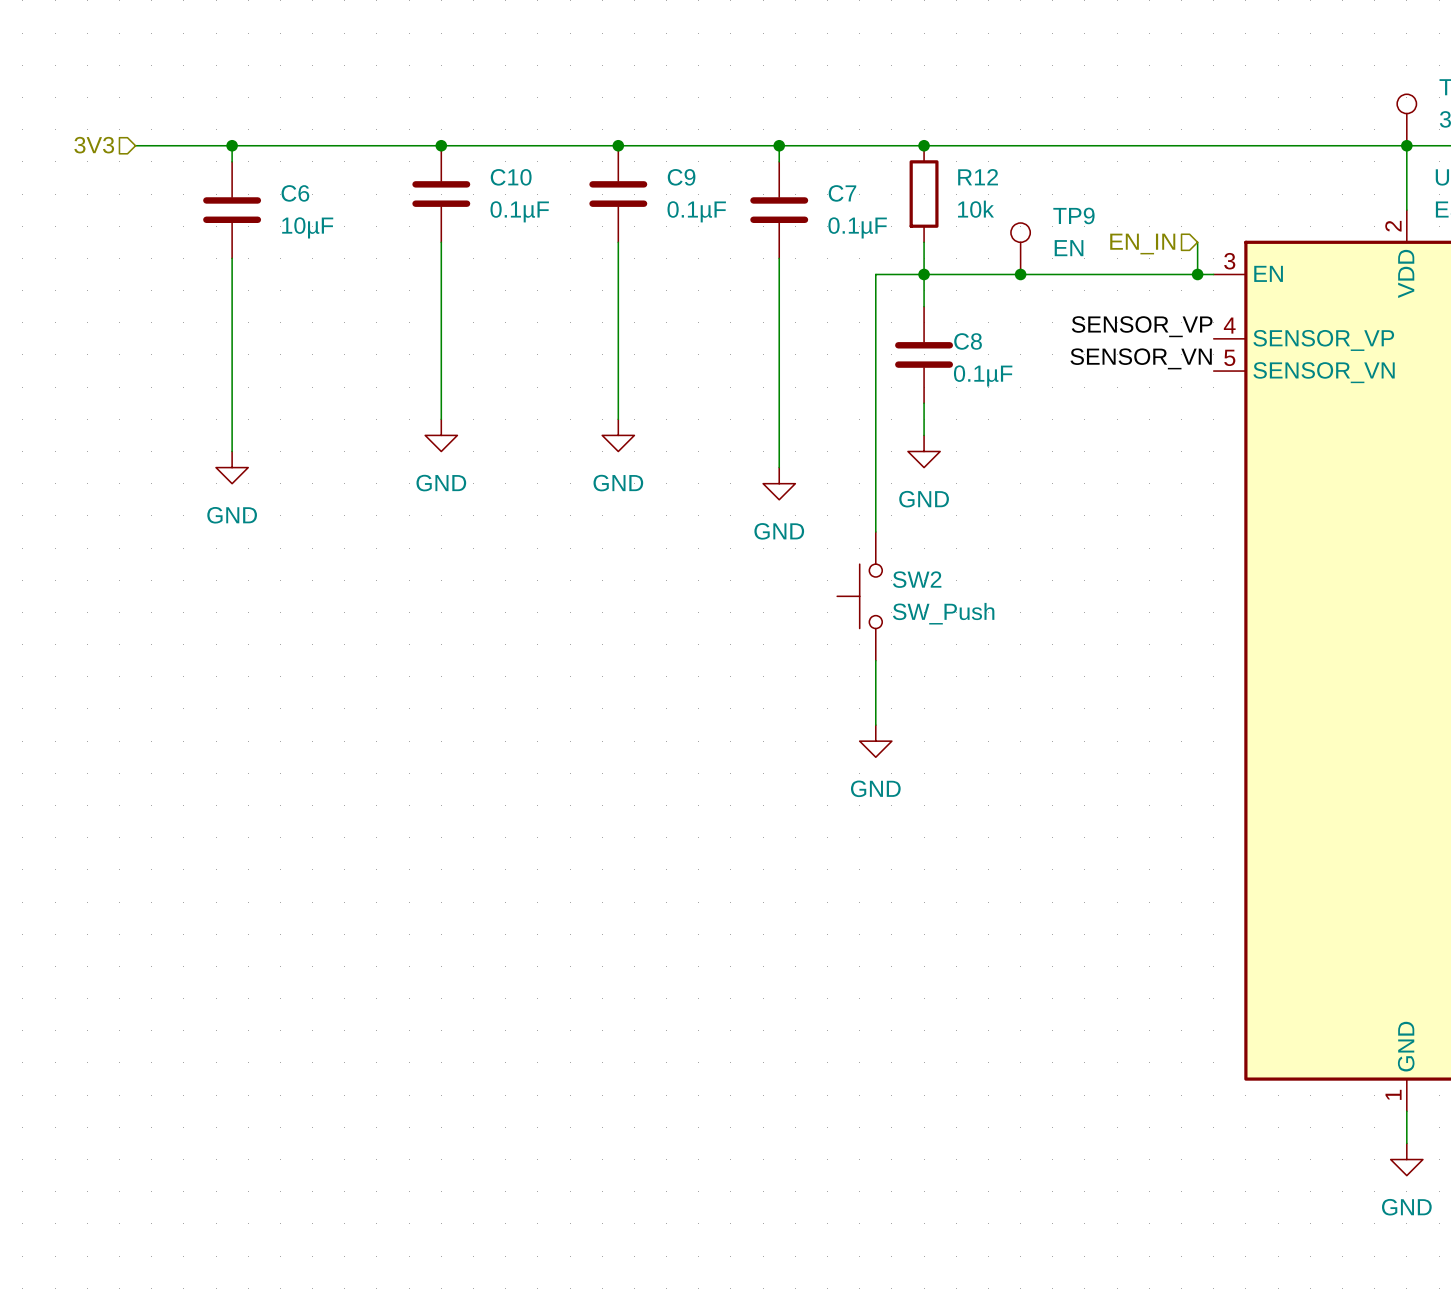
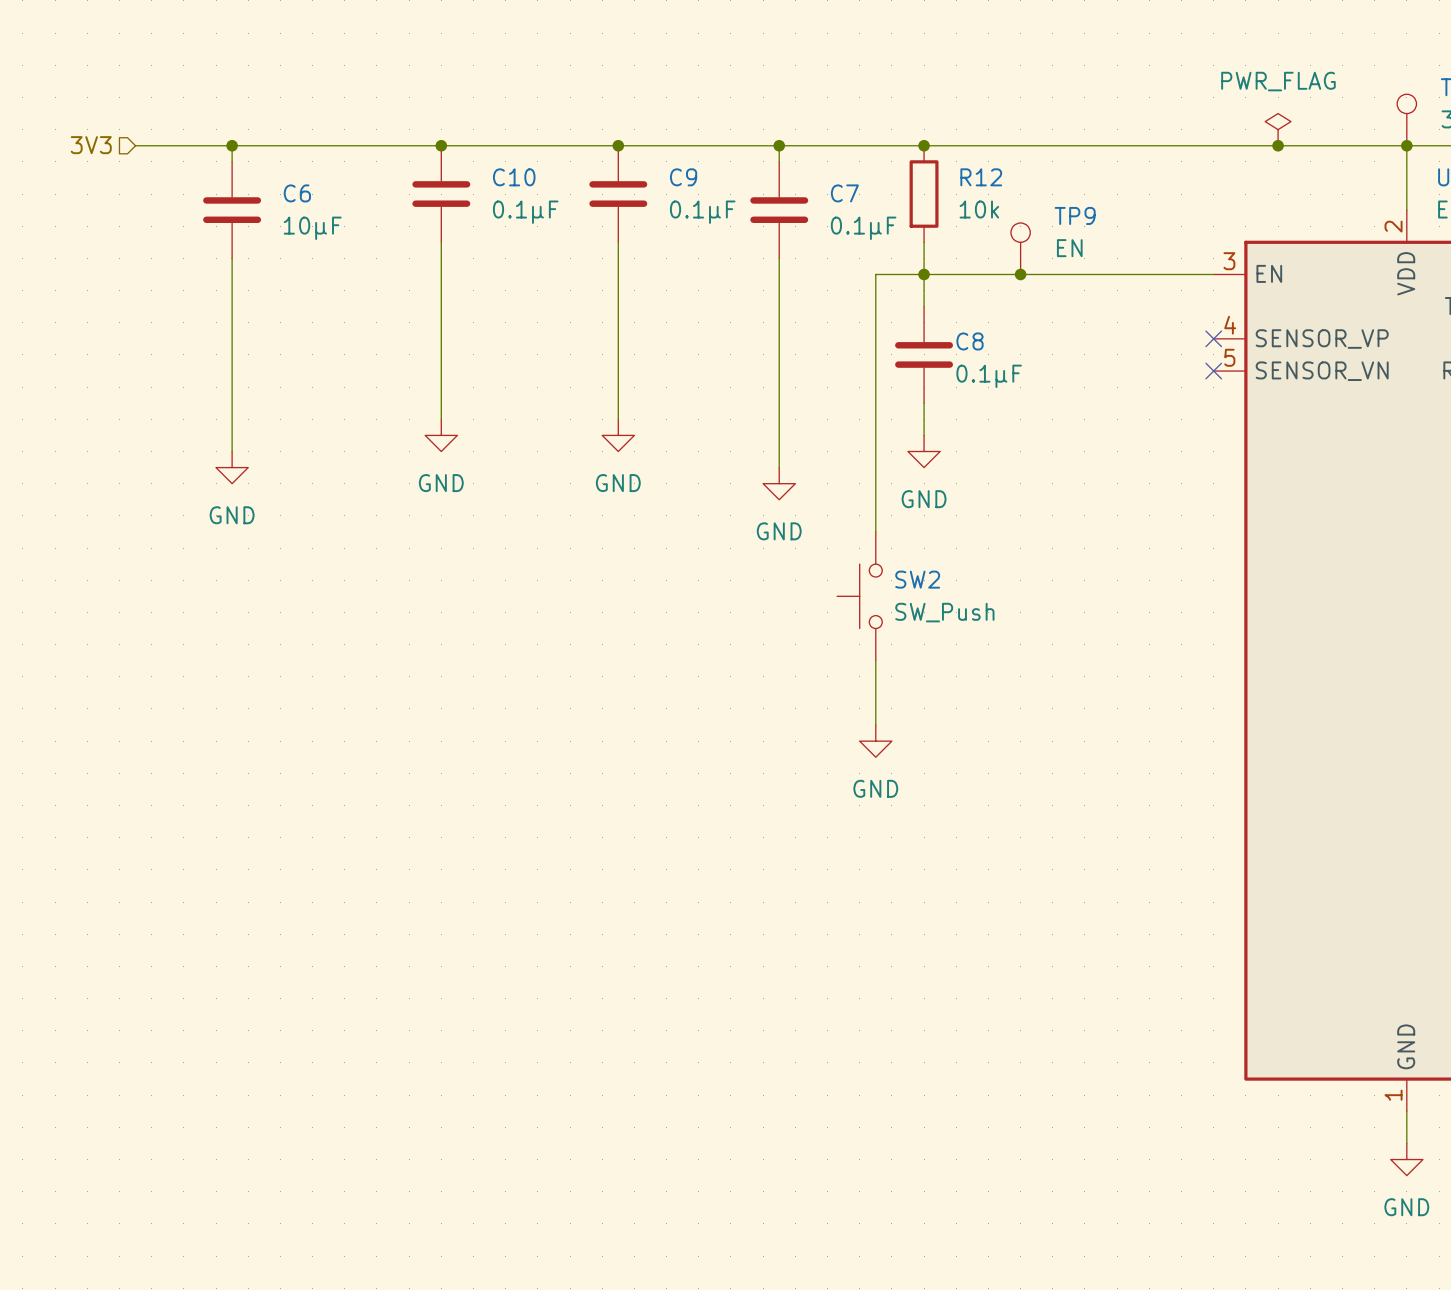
power symbol: none -> PWR_FLAG (1278, 129)
junction: none -> (1278, 145)
wire: (1197, 242) (1197, 274) -> none
hierarchical label: EN_IN (1142, 244) -> none
junction: (1197, 274) -> none
label: SENSOR_VP (1142, 326) -> none
no-connect mark: none -> (1213, 338)
label: SENSOR_VN (1141, 358) -> none
no-connect mark: none -> (1213, 371)

